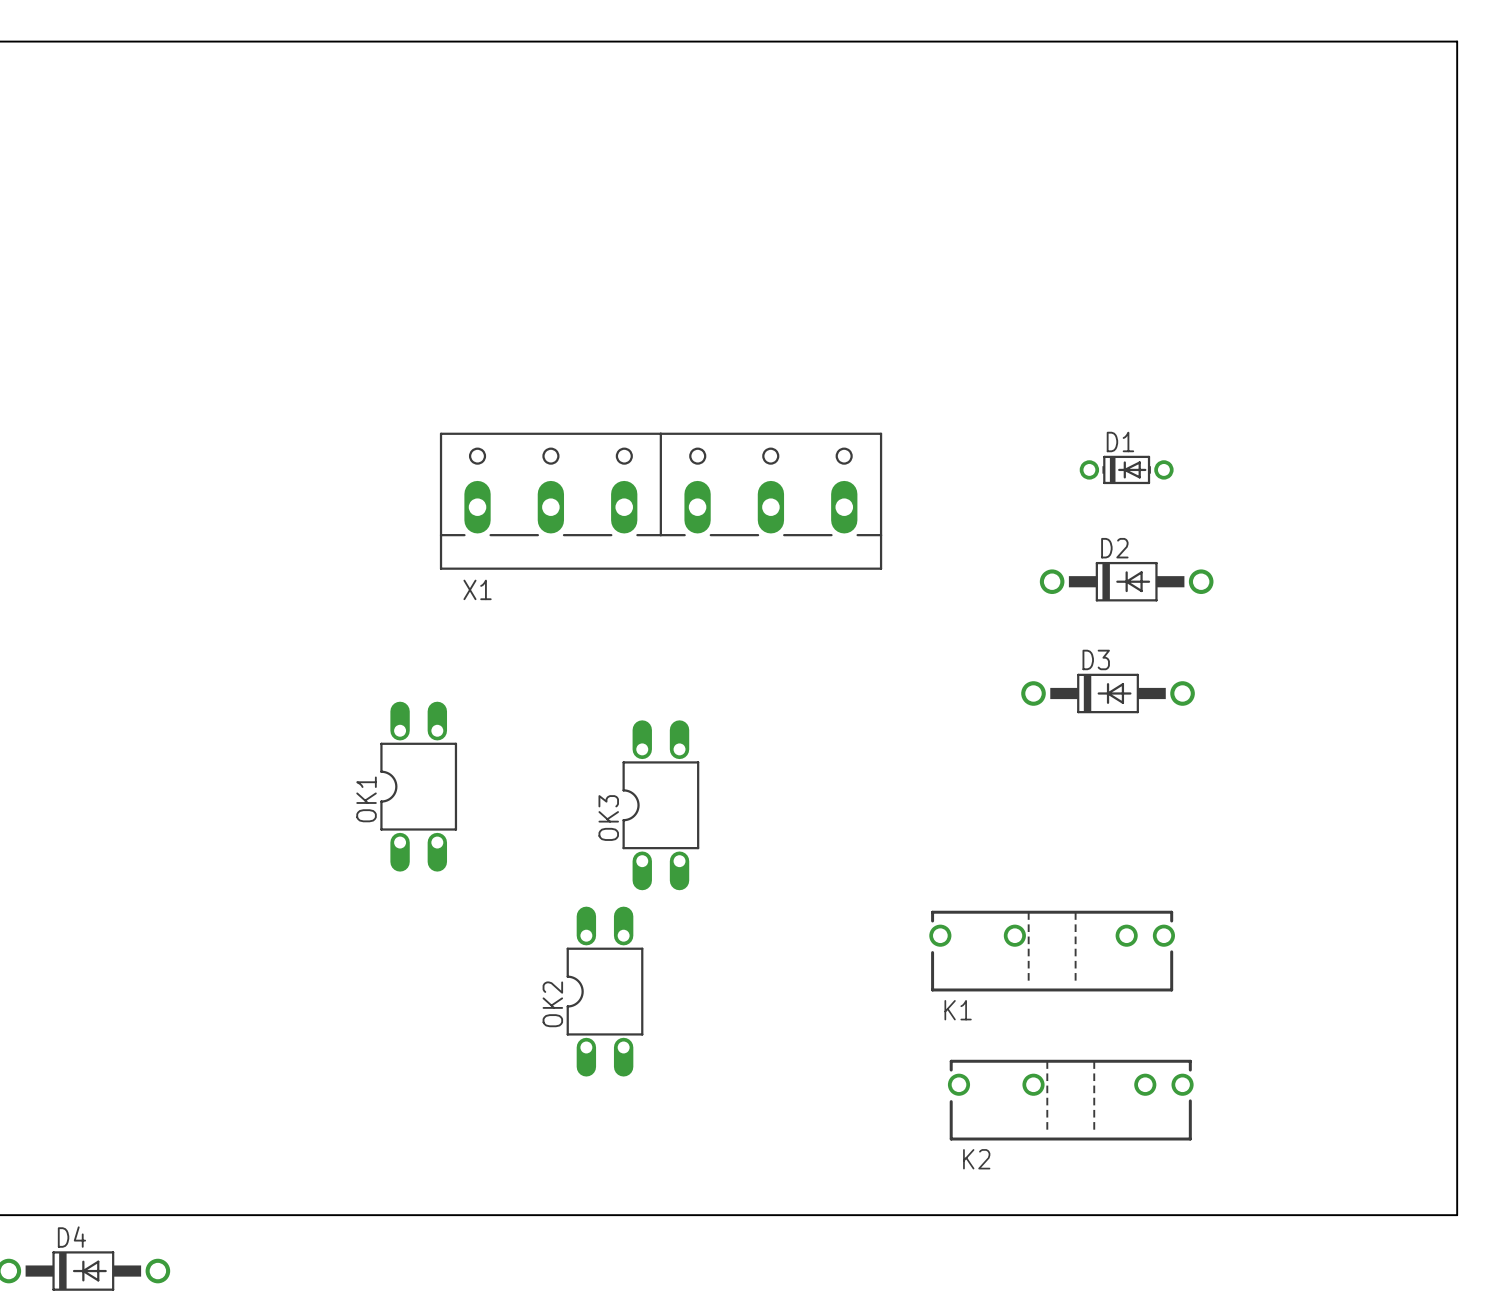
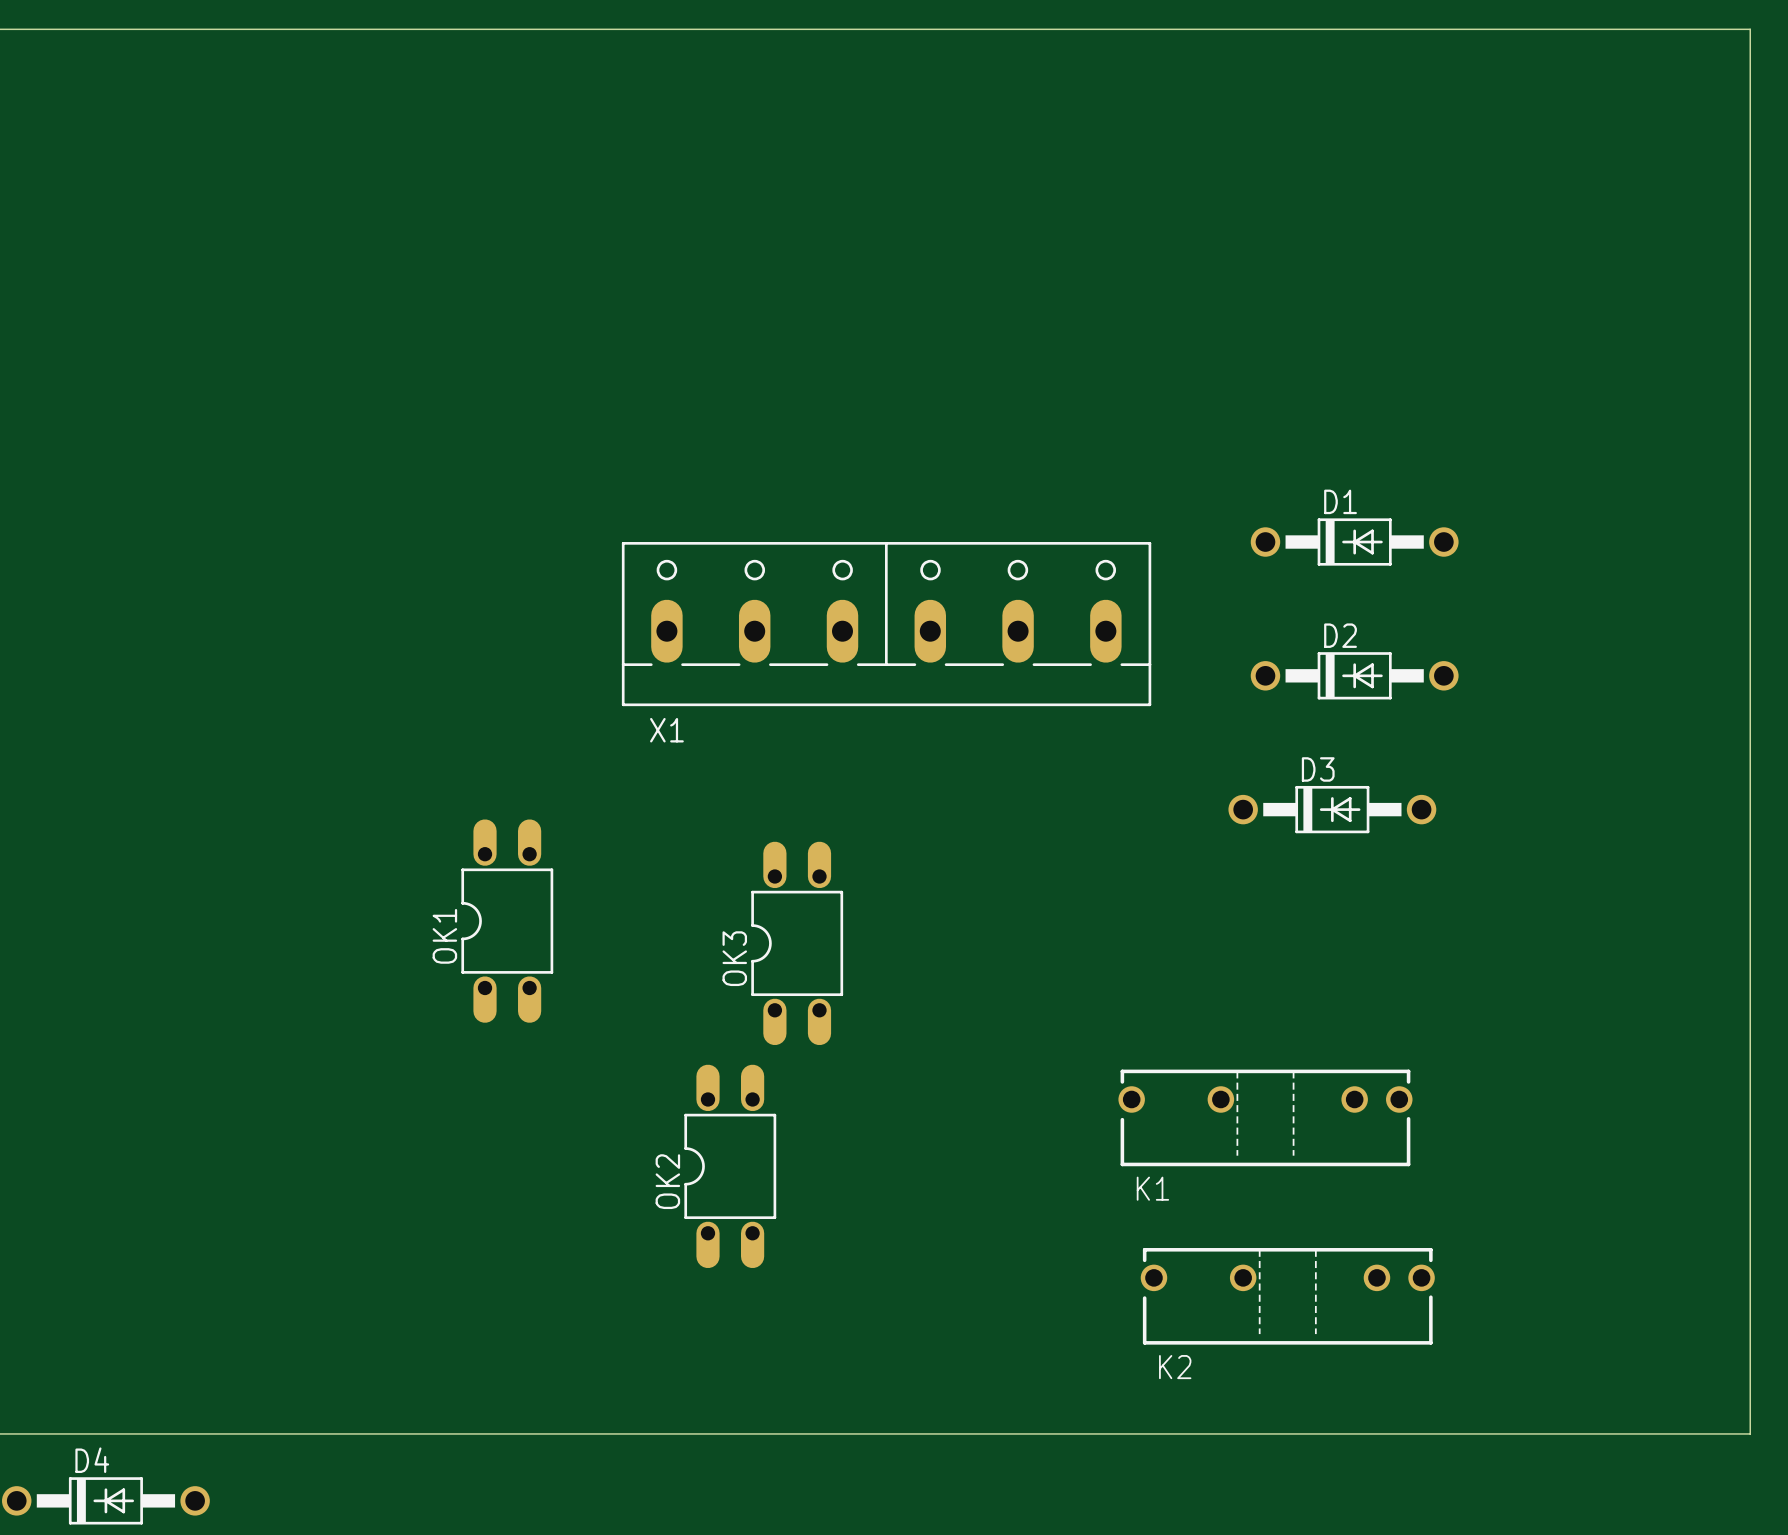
D1 footprint: [1079, 455, 1174, 485] -> [1250, 518, 1459, 566]
X1 position: (661, 501) -> (886, 624)

